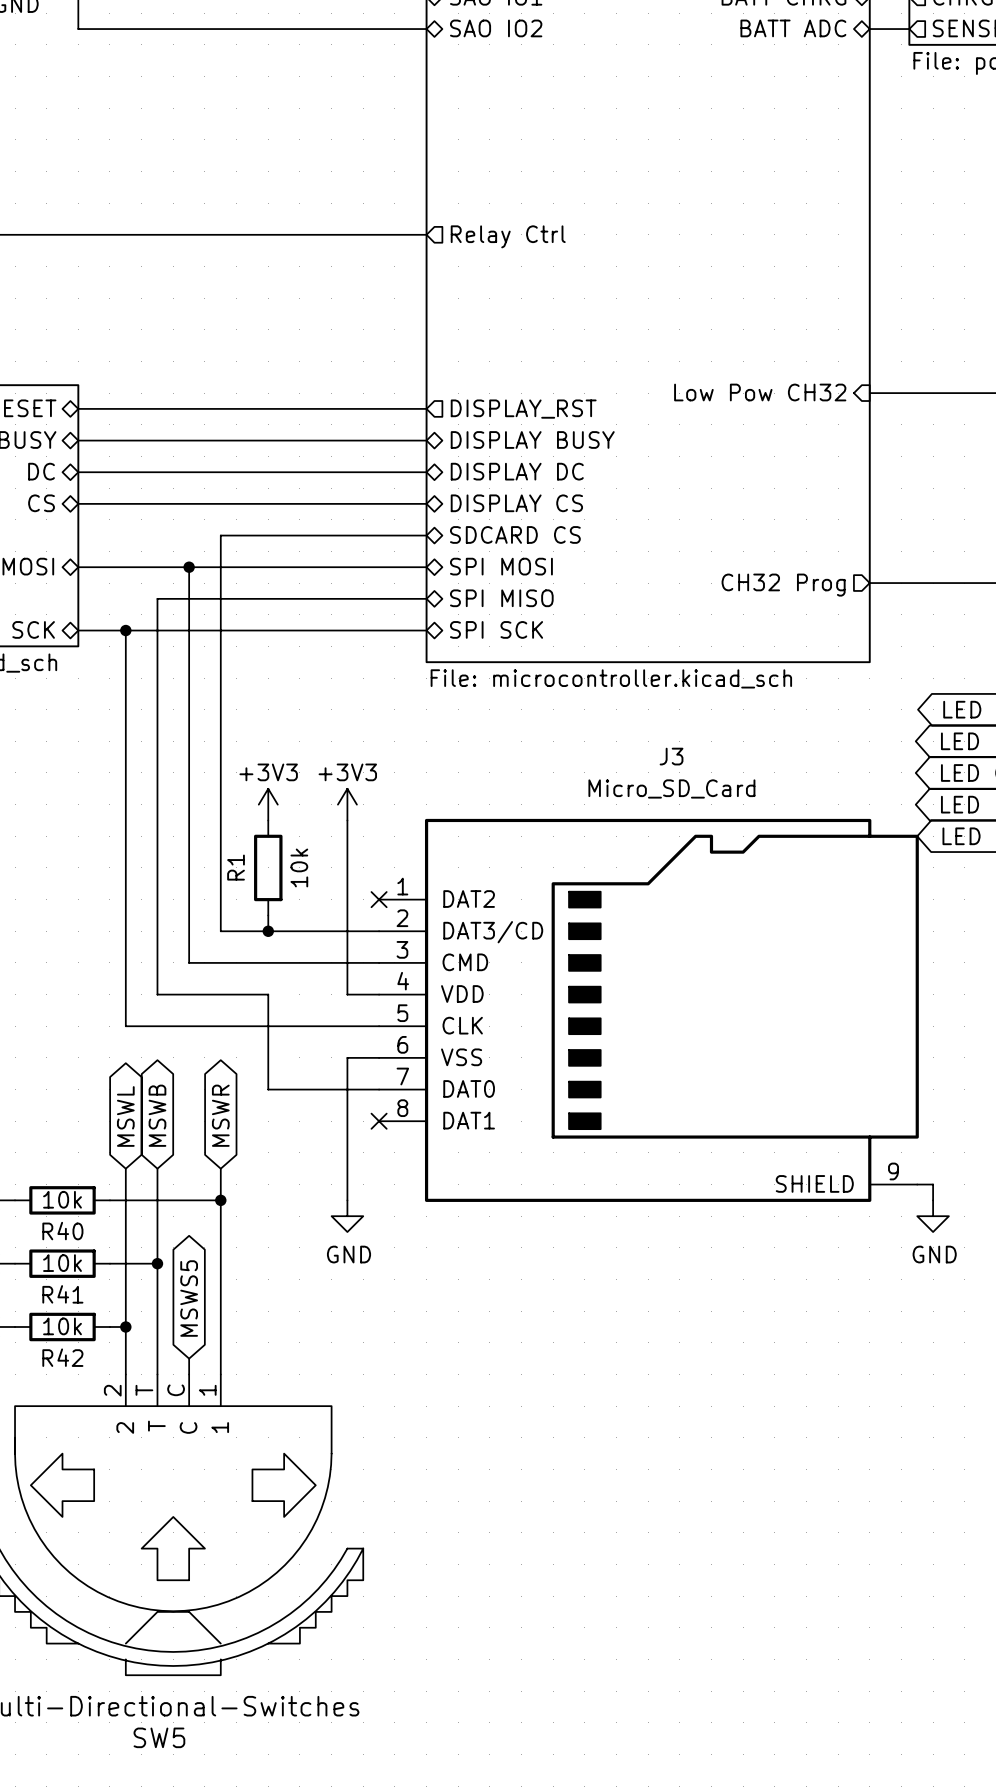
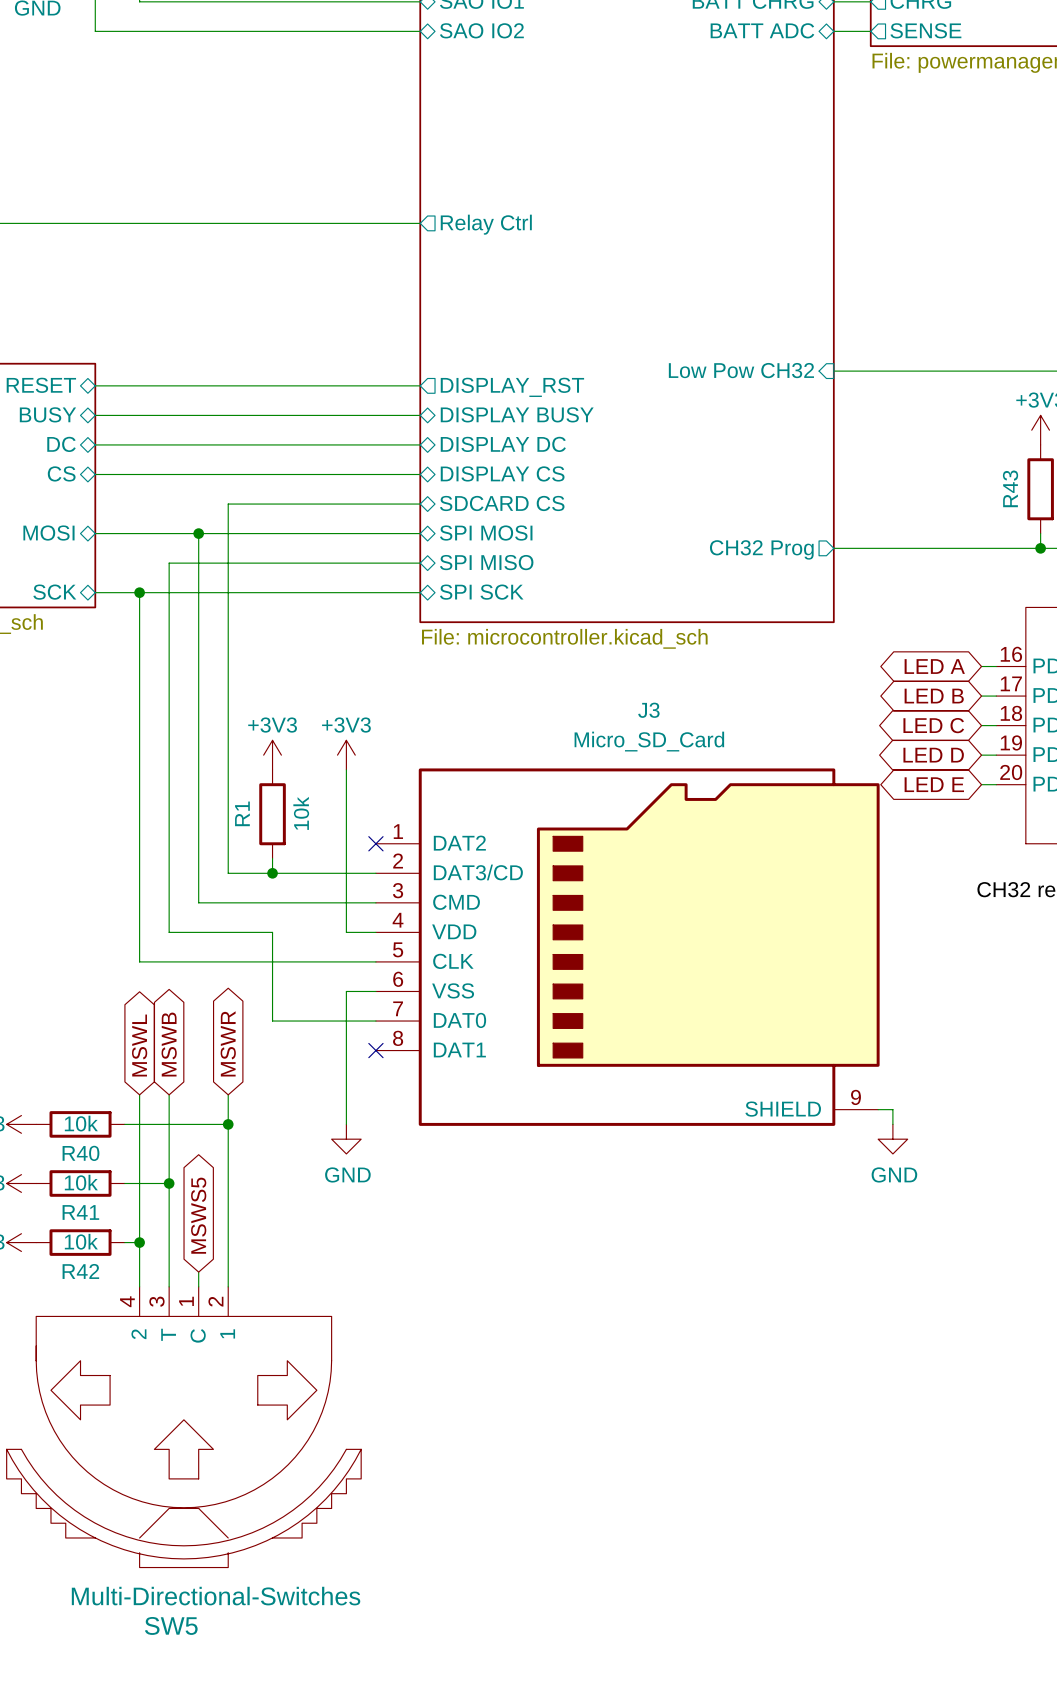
SW5 pin number: 2 (112, 1390) -> 4 (127, 1301)
SW5 pin number: T (144, 1390) -> 3 (156, 1301)
SW5 pin number: C (176, 1390) -> 1 (186, 1301)
SW5 pin number: 1 (207, 1390) -> 2 (215, 1301)

